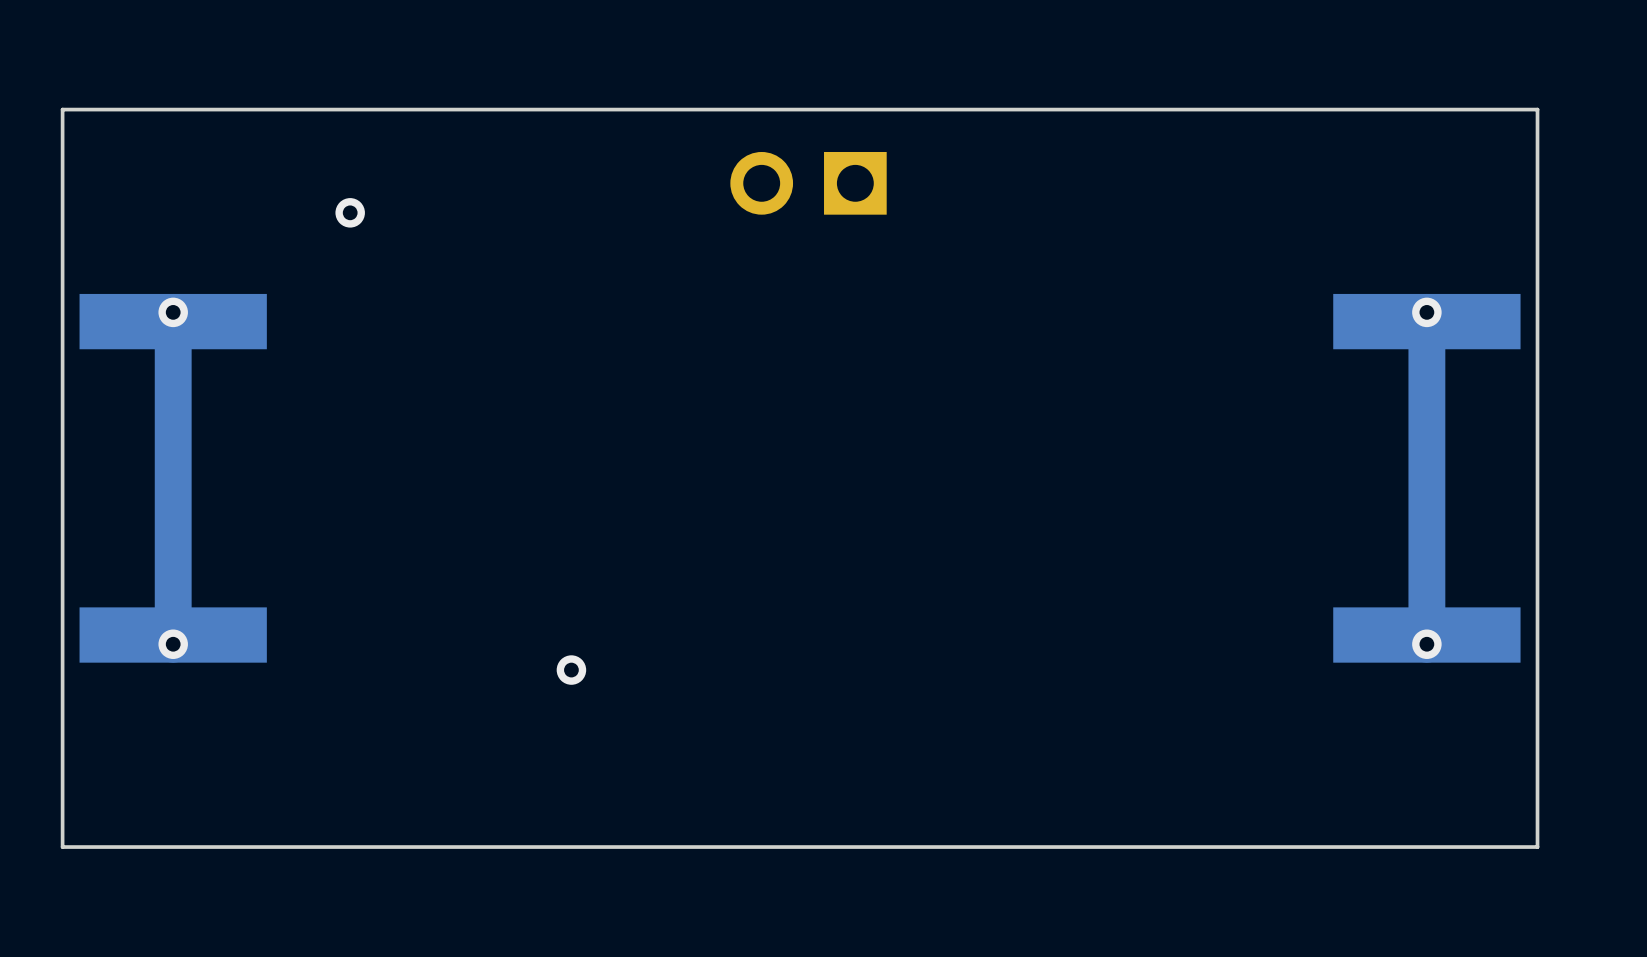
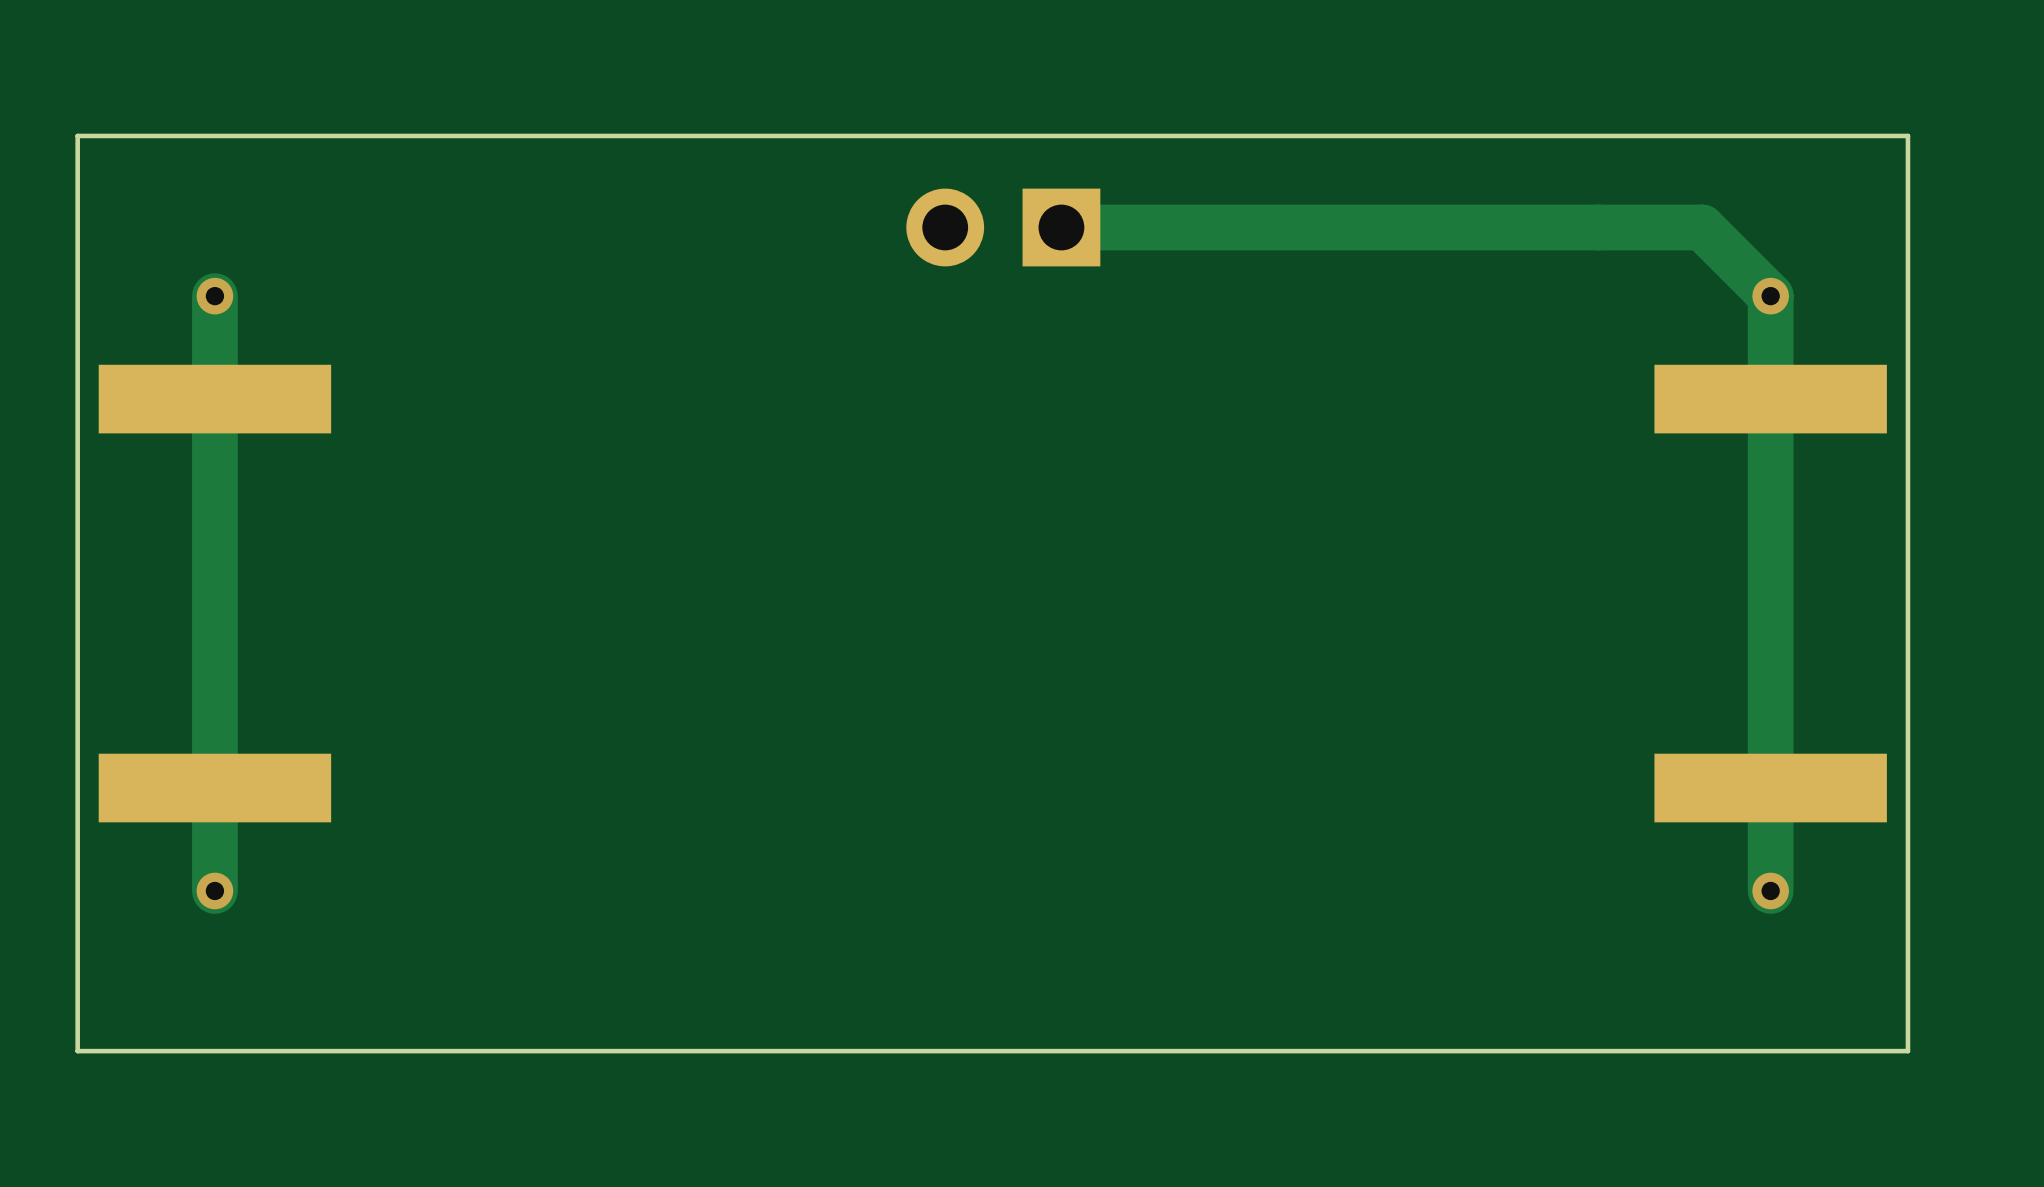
track: none -> (1061, 227) (1702, 227) (1770, 296) (1770, 387)
via: (350, 212) -> none
track: none -> (214, 296) (214, 387)
via position: (173, 312) -> (214, 296)
via position: (1426, 312) -> (1770, 296)
track: none -> (214, 799) (214, 890)
via position: (173, 644) -> (214, 890)
track: none -> (1770, 799) (1770, 890)
via position: (1426, 644) -> (1770, 890)
via: (571, 670) -> none

